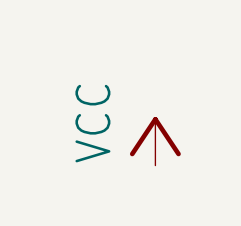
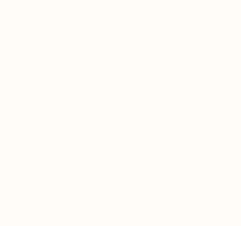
power symbol: VCC (155, 141) -> none

